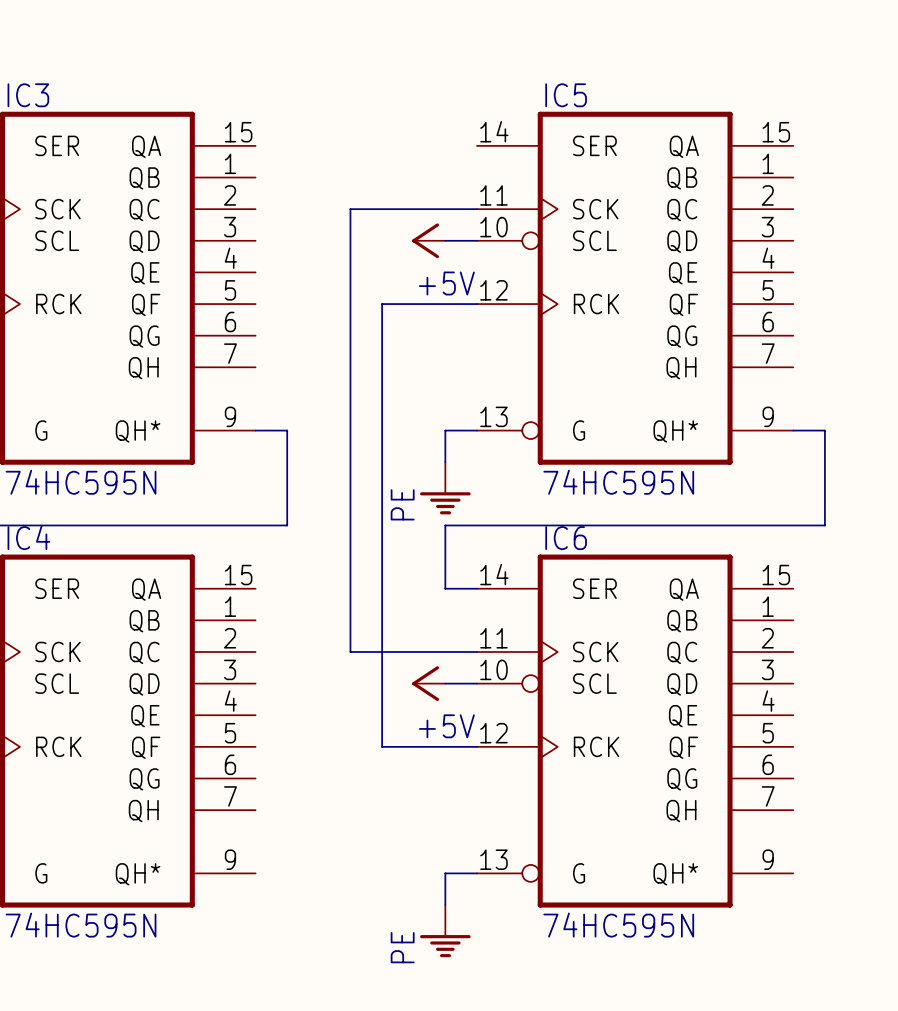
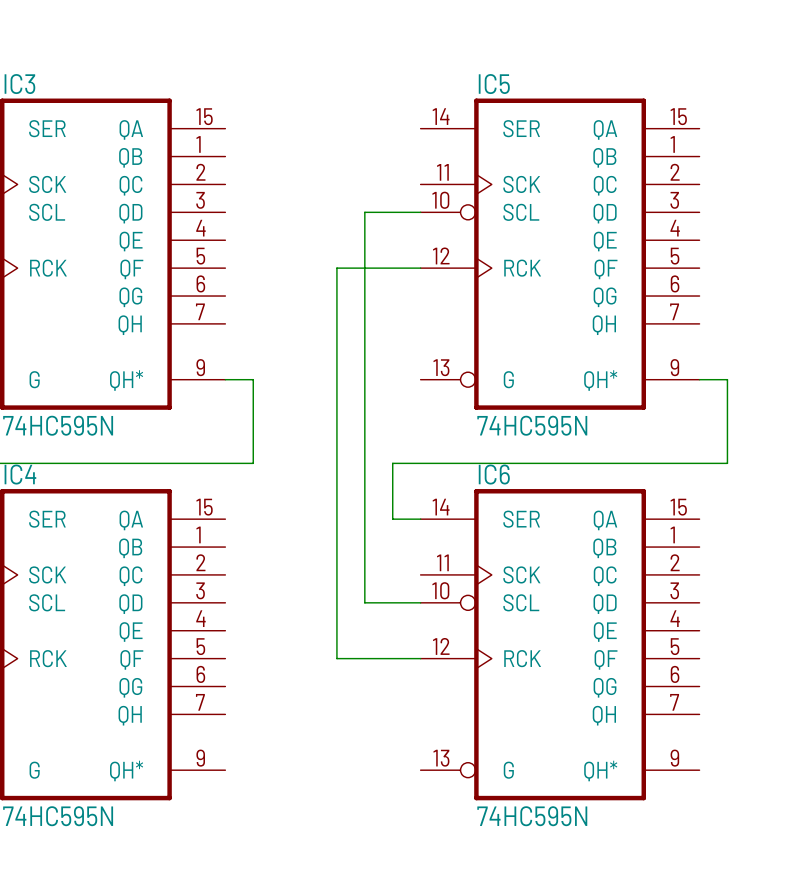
wire: (476, 209) (350, 209) (350, 651) (476, 651) -> none
power symbol: +5V (428, 240) -> none
wire: none -> (392, 212) (364, 212) (364, 602) (392, 602)
wire: (476, 430) (445, 430) (445, 462) -> none
power symbol: PE (445, 488) -> none
power symbol: +5V (428, 683) -> none
wire: (476, 873) (445, 873) (445, 905) -> none
power symbol: PE (445, 931) -> none

